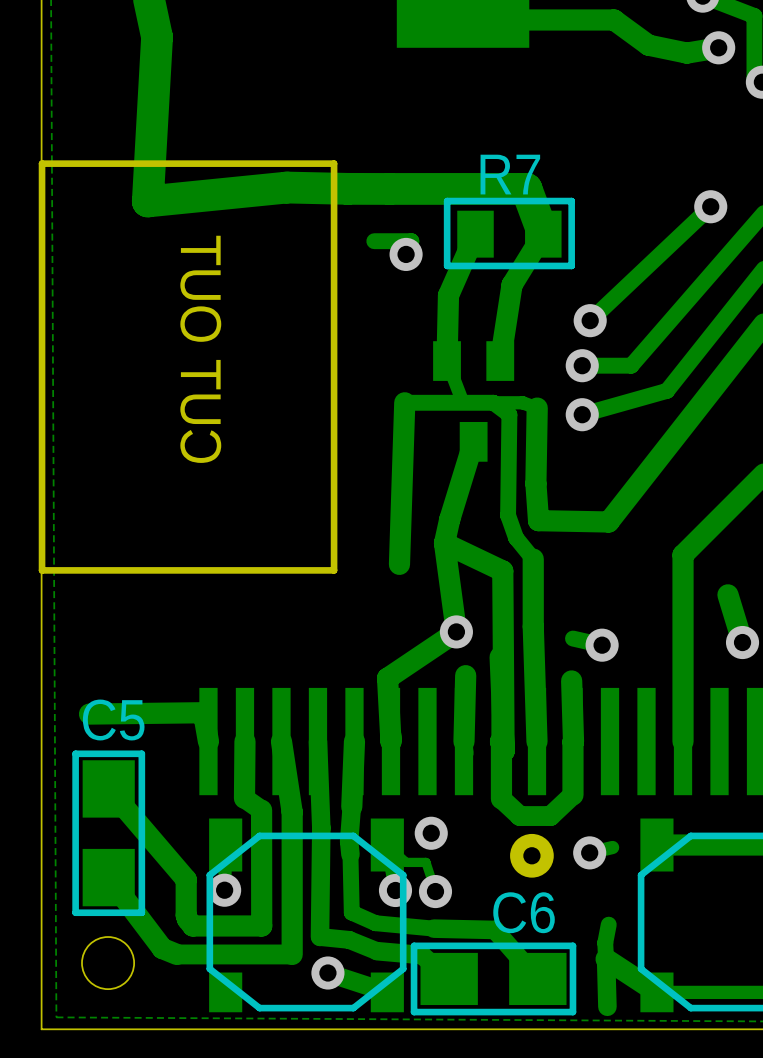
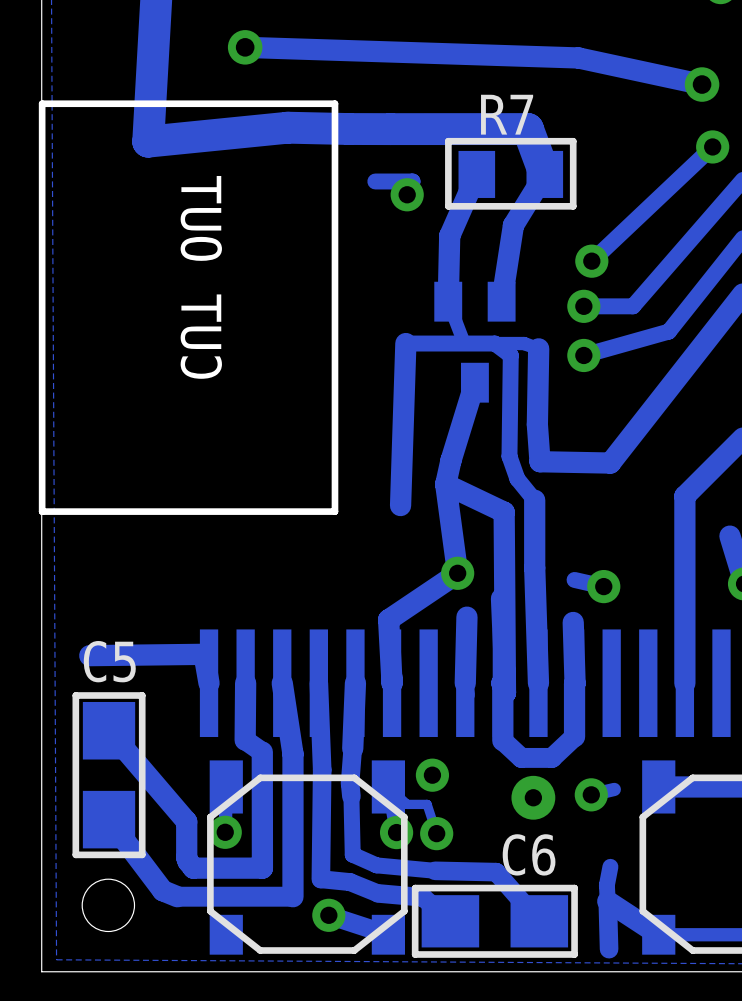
track: none -> (245, 47) (578, 57) (702, 84)
via: none -> (245, 47)
via: none -> (702, 84)

